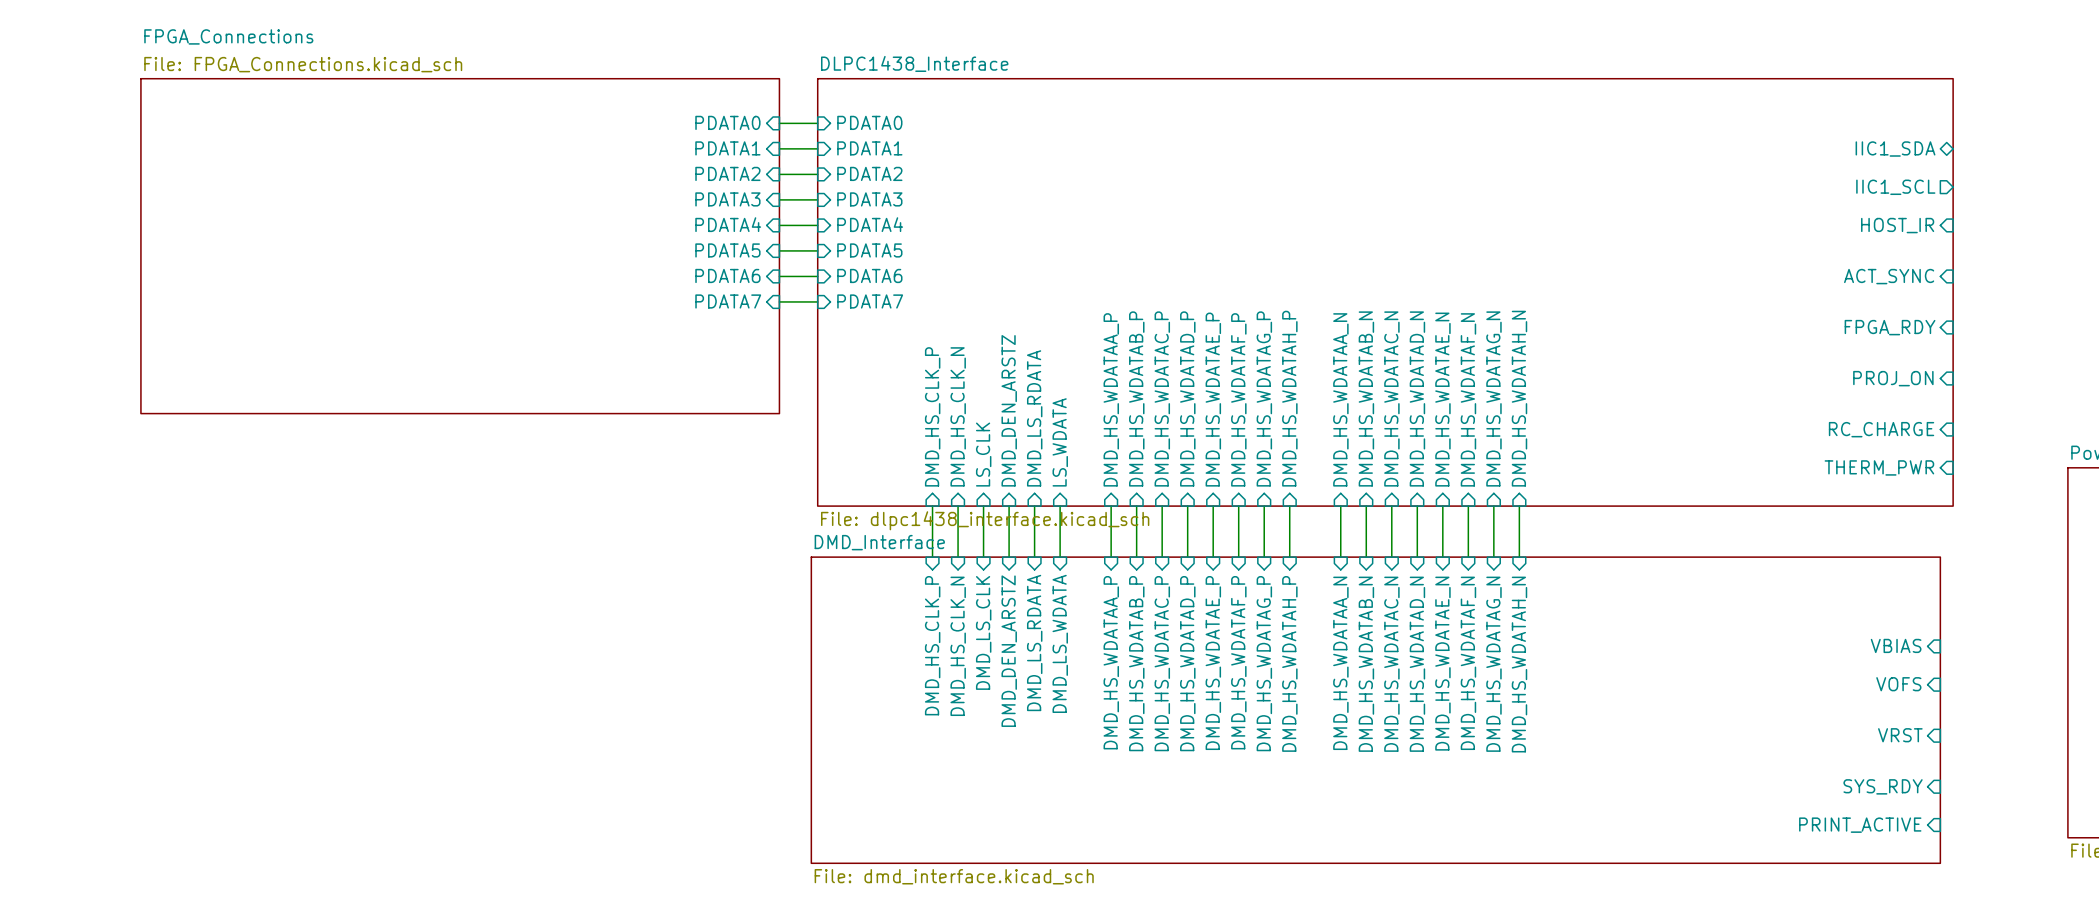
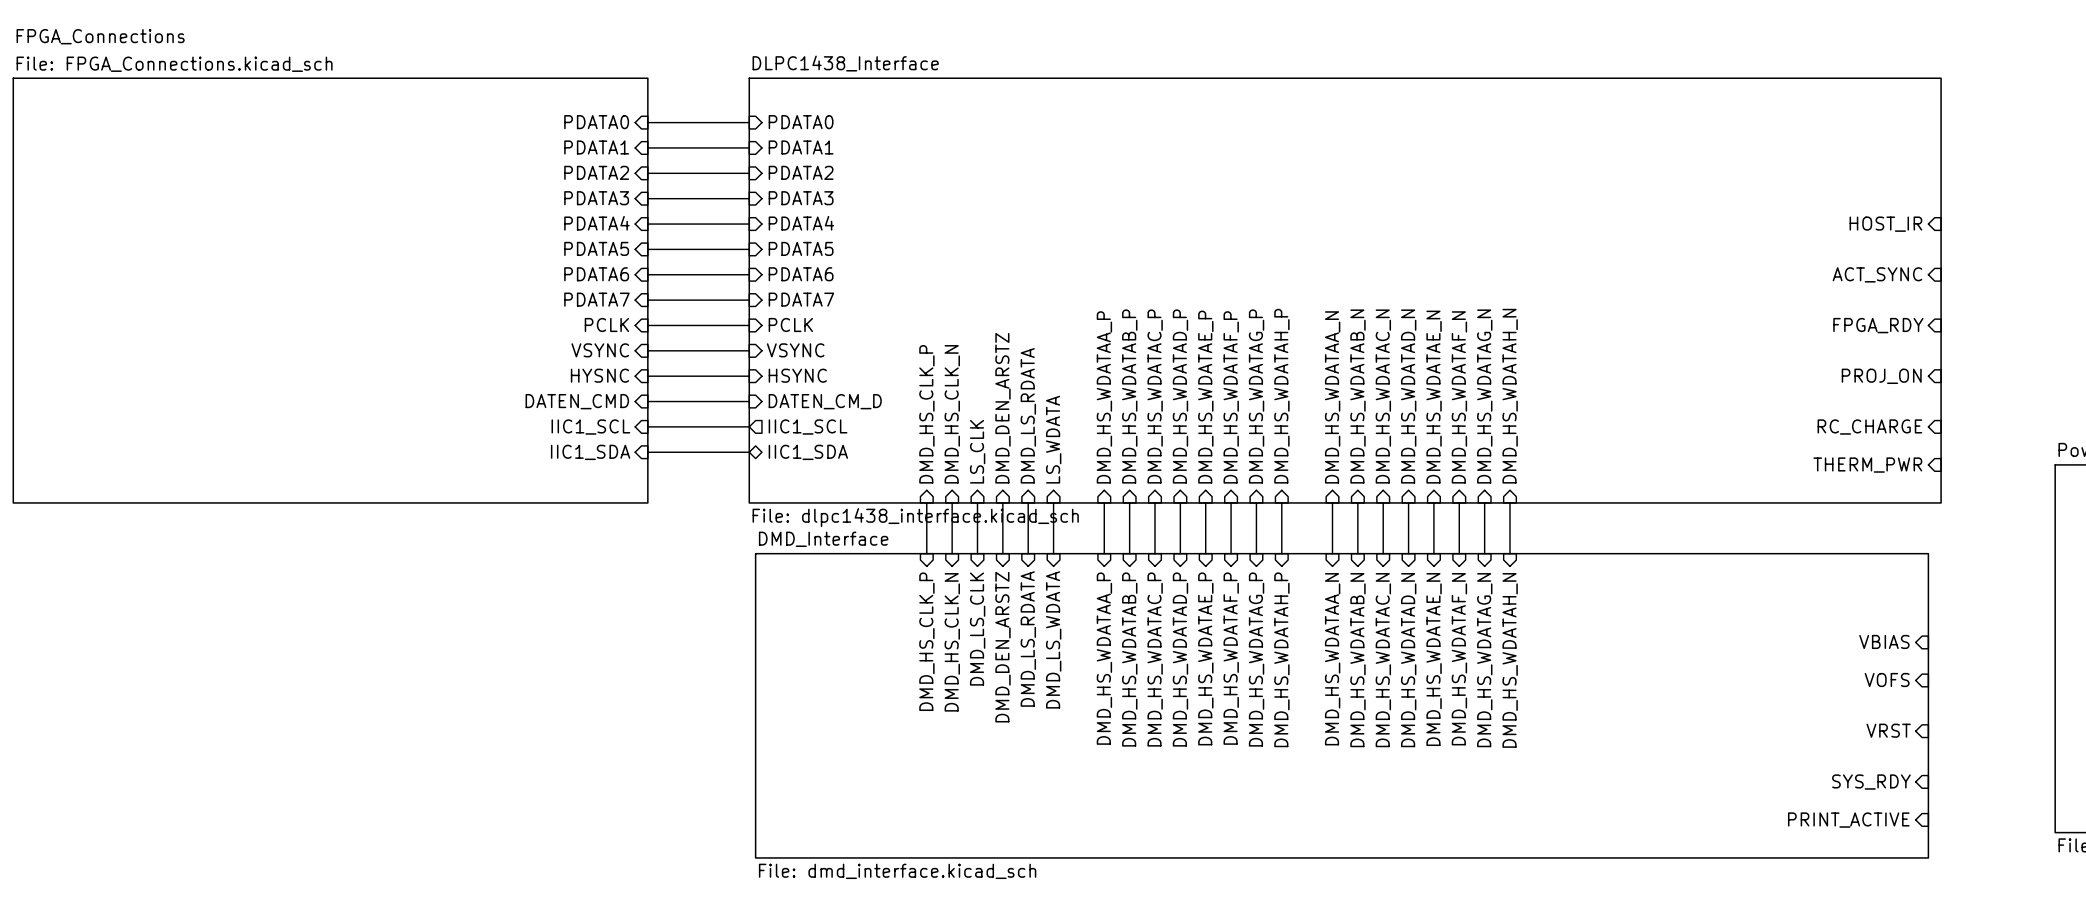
sheet DLPC1438_Interface name position: DLPC1438_Interface (914, 63) -> DLPC1438_Interface (845, 63)
sheet DLPC1438_Interface shape: [816, 77, 1954, 507] -> [748, 77, 1942, 504]
sheet pin rotation: 0° (727, 122) -> 180° (801, 122)
sheet pin position: PDATA0 (727, 122) -> PDATA0 (801, 122)
sheet pin rotation: 0° (869, 122) -> 180° (596, 122)
sheet pin position: PDATA0 (869, 122) -> PDATA0 (596, 122)
wire: none -> (647, 122) (749, 122)
wire: (779, 123) (817, 123) -> none
wire: none -> (647, 147) (749, 147)
sheet pin rotation: 0° (727, 148) -> 180° (801, 147)
sheet pin position: PDATA1 (727, 148) -> PDATA1 (801, 147)
wire: (779, 148) (817, 148) -> none
sheet pin rotation: 0° (869, 148) -> 180° (596, 147)
sheet pin position: PDATA1 (869, 148) -> PDATA1 (596, 147)
sheet pin: IIC1_SDA (1895, 149) -> none
sheet pin rotation: 0° (727, 173) -> 180° (801, 172)
sheet pin position: PDATA2 (727, 173) -> PDATA2 (801, 172)
sheet pin rotation: 0° (869, 173) -> 180° (596, 172)
sheet pin position: PDATA2 (869, 173) -> PDATA2 (596, 172)
wire: none -> (647, 173) (749, 173)
wire: (779, 174) (817, 174) -> none
sheet pin: IIC1_SCL (1895, 187) -> none
wire: none -> (647, 198) (749, 198)
sheet pin rotation: 0° (727, 199) -> 180° (801, 198)
sheet pin position: PDATA3 (727, 199) -> PDATA3 (801, 198)
wire: (779, 199) (817, 199) -> none
sheet pin rotation: 0° (869, 199) -> 180° (596, 198)
sheet pin position: PDATA3 (869, 199) -> PDATA3 (596, 198)
sheet pin rotation: 0° (728, 224) -> 180° (801, 223)
sheet pin position: PDATA4 (728, 224) -> PDATA4 (801, 223)
sheet pin rotation: 0° (870, 224) -> 180° (596, 223)
sheet pin position: PDATA4 (870, 224) -> PDATA4 (596, 223)
wire: none -> (647, 224) (749, 224)
wire: (779, 225) (817, 225) -> none
sheet FPGA_Connections: File: FPGA_Connections.kicad_sch (460, 246) -> none
wire: none -> (647, 249) (749, 249)
sheet pin rotation: 0° (727, 250) -> 180° (801, 248)
sheet pin position: PDATA5 (727, 250) -> PDATA5 (801, 248)
wire: (779, 250) (817, 250) -> none
sheet pin rotation: 0° (869, 250) -> 180° (596, 248)
sheet pin position: PDATA5 (869, 250) -> PDATA5 (596, 248)
sheet pin rotation: 0° (727, 275) -> 180° (801, 274)
sheet pin position: PDATA6 (727, 275) -> PDATA6 (801, 274)
sheet pin rotation: 0° (869, 275) -> 180° (596, 274)
sheet pin position: PDATA6 (869, 275) -> PDATA6 (596, 274)
wire: none -> (647, 274) (749, 274)
wire: (779, 276) (817, 276) -> none
sheet FPGA_Connections: none -> File: FPGA_Connections.kicad_sch (330, 290)
wire: none -> (647, 300) (749, 300)
sheet pin rotation: 0° (728, 301) -> 180° (801, 299)
sheet pin position: PDATA7 (728, 301) -> PDATA7 (801, 299)
wire: (779, 301) (817, 301) -> none
sheet pin rotation: 0° (870, 301) -> 180° (596, 299)
sheet pin position: PDATA7 (870, 301) -> PDATA7 (596, 299)
sheet pin: none -> PCLK (606, 324)
wire: none -> (647, 325) (749, 325)
sheet pin: none -> PCLK (790, 324)
sheet pin: none -> VSYNC (600, 350)
sheet pin: none -> VSYNC (795, 350)
wire: none -> (647, 350) (749, 350)
sheet pin: none -> HYSNC (599, 375)
wire: none -> (647, 376) (749, 376)
sheet pin: none -> HSYNC (797, 375)
sheet pin: none -> DATEN_CMD (577, 401)
wire: none -> (647, 401) (749, 401)
sheet pin: none -> DATEN_CM_D (825, 401)
sheet pin: none -> IIC1_SCL (590, 427)
wire: none -> (647, 426) (749, 426)
sheet pin: none -> IIC1_SCL (808, 427)
sheet pin: none -> IIC1_SDA (590, 452)
wire: none -> (647, 452) (749, 452)
sheet pin: none -> IIC1_SDA (808, 452)
sheet DLPC1438_Interface value position: File: dlpc1438_interface.kicad_sch (985, 520) -> File: dlpc1438_interface.kicad_sch (915, 517)
sheet DMD_Interface: none -> File: dmd_interface.kicad_sch (1342, 705)
sheet DMD_Interface: File: dmd_interface.kicad_sch (1375, 710) -> none

